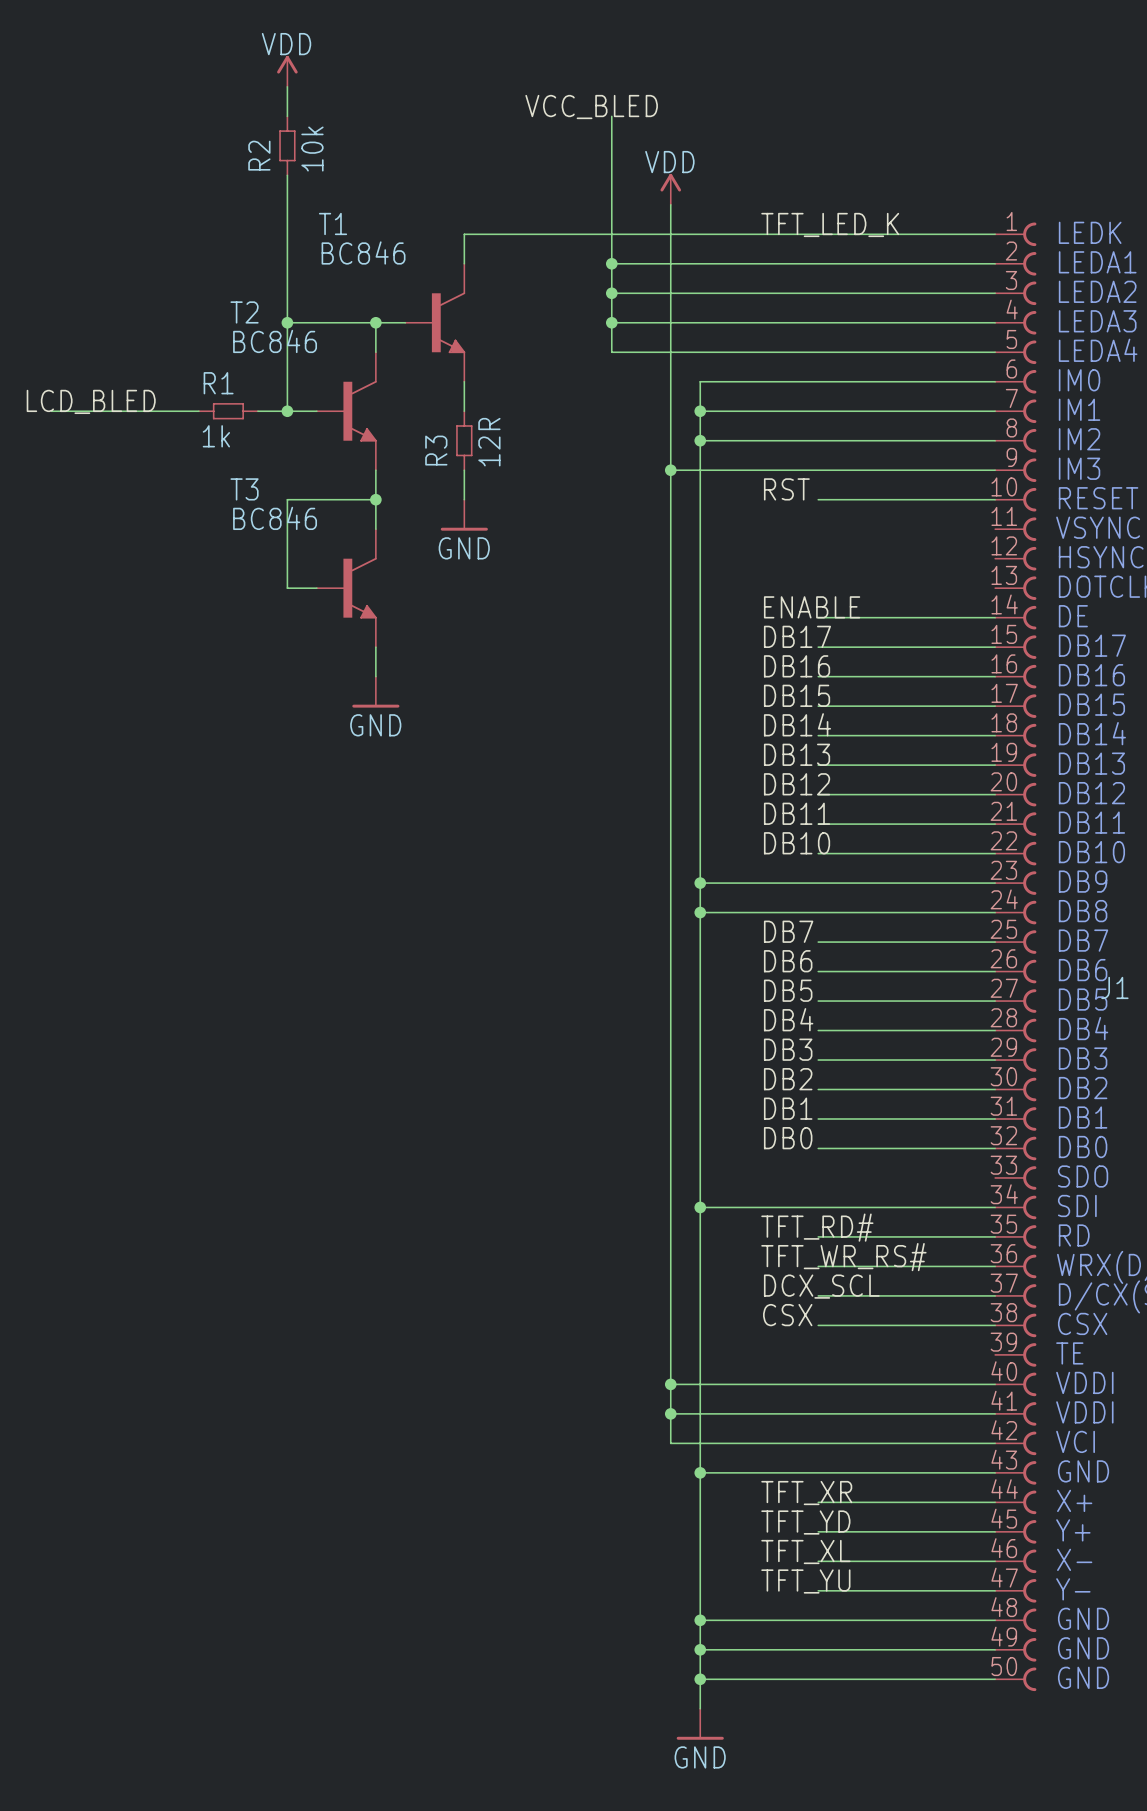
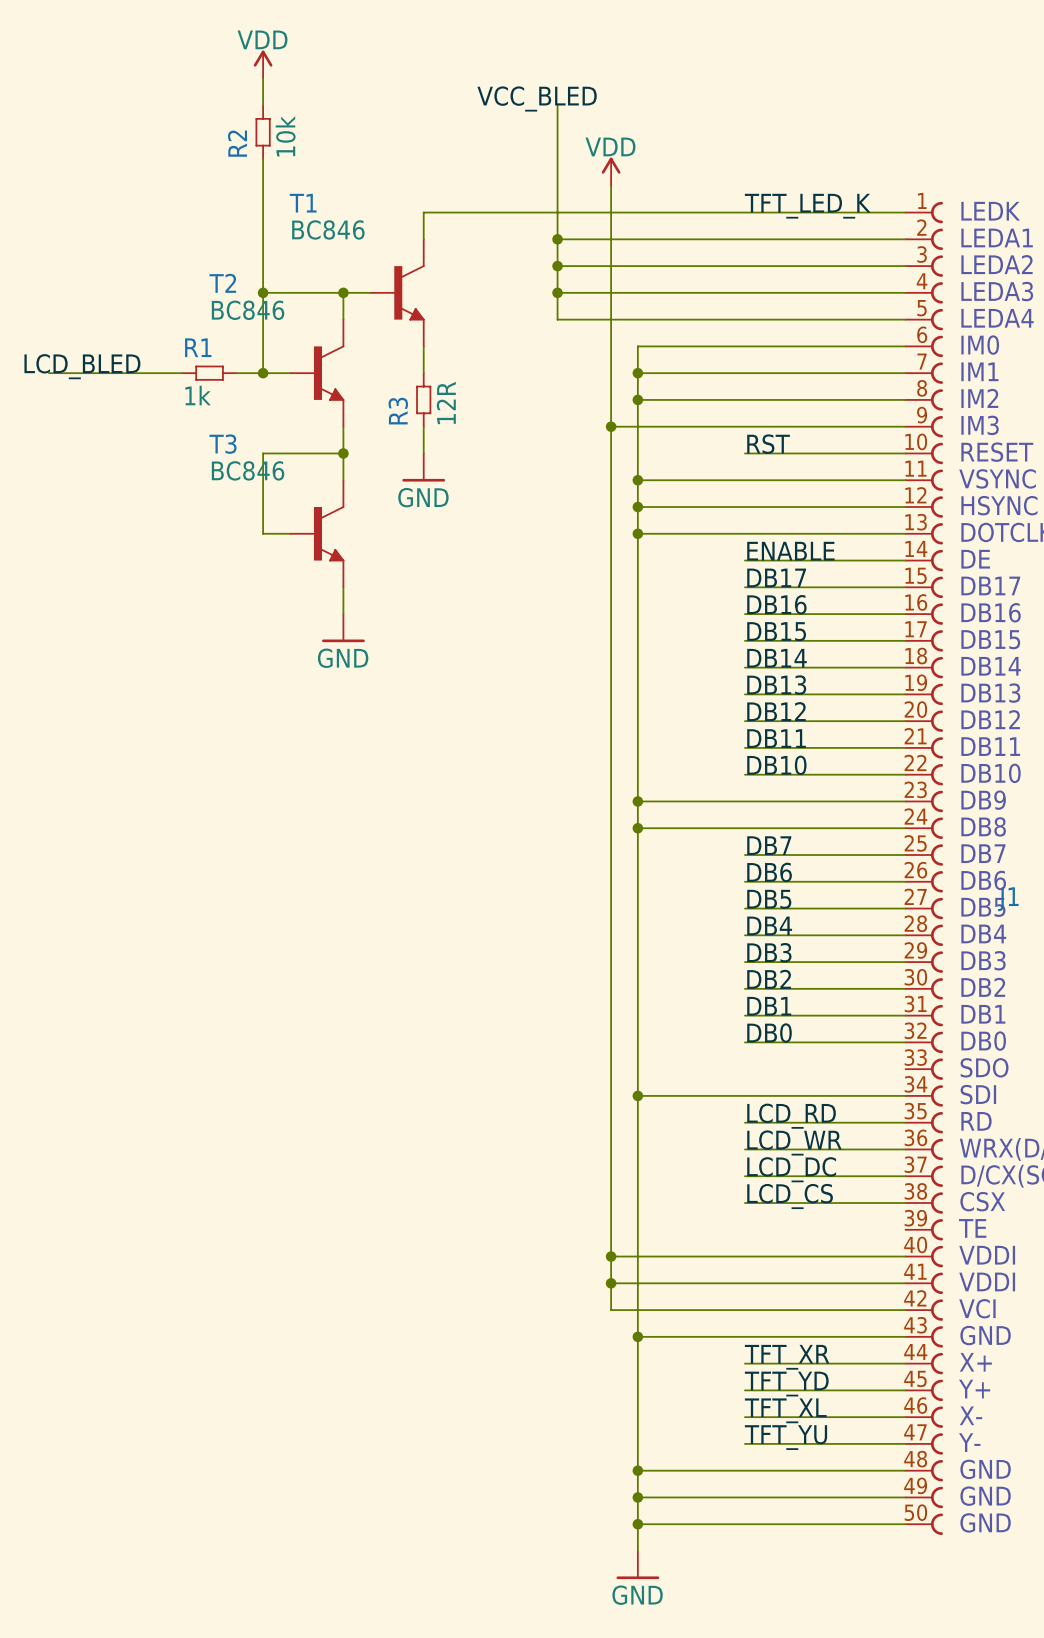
label position: TFT_LED_K (830, 224) -> TFT_LED_K (807, 206)
label position: RST (786, 489) -> RST (768, 444)
wire: none -> (637, 480) (905, 480)
junction: none -> (637, 480)
wire: none -> (637, 507) (905, 507)
junction: none -> (637, 507)
wire: none -> (637, 533) (905, 533)
junction: none -> (637, 533)
label position: ENABLE (812, 607) -> ENABLE (790, 551)
label position: DB17 (797, 636) -> DB17 (776, 577)
label position: DB16 (797, 666) -> DB16 (776, 604)
label position: DB15 (797, 695) -> DB15 (776, 631)
label position: DB14 (797, 724) -> DB14 (776, 658)
label position: DB13 (797, 754) -> DB13 (776, 685)
label position: DB12 (797, 784) -> DB12 (776, 711)
label position: DB11 (797, 813) -> DB11 (776, 738)
label position: DB10 (797, 843) -> DB10 (776, 765)
label position: DB7 (788, 931) -> DB7 (769, 845)
label position: DB6 (788, 961) -> DB6 (769, 872)
label position: DB5 (788, 990) -> DB5 (769, 899)
label position: DB4 (788, 1019) -> DB4 (769, 925)
label position: DB3 (788, 1049) -> DB3 (769, 952)
label position: DB2 (788, 1079) -> DB2 (769, 979)
label position: DB1 (788, 1108) -> DB1 (769, 1006)
label position: DB0 (788, 1138) -> DB0 (769, 1033)
label: TFT_RD# (817, 1227) -> none
label: none -> LCD_RD (791, 1116)
label: TFT_WR_RS# (843, 1257) -> none
label: none -> LCD_WR (794, 1142)
label: DCX_SCL (821, 1286) -> none
label: none -> LCD_DC (791, 1169)
label: CSX (787, 1315) -> none
label: none -> LCD_CS (790, 1196)
label position: TFT_XR (806, 1493) -> TFT_XR (787, 1357)
label position: TFT_YD (805, 1522) -> TFT_YD (786, 1384)
label position: TFT_XL (805, 1552) -> TFT_XL (785, 1410)
label position: TFT_YU (805, 1581) -> TFT_YU (785, 1437)

